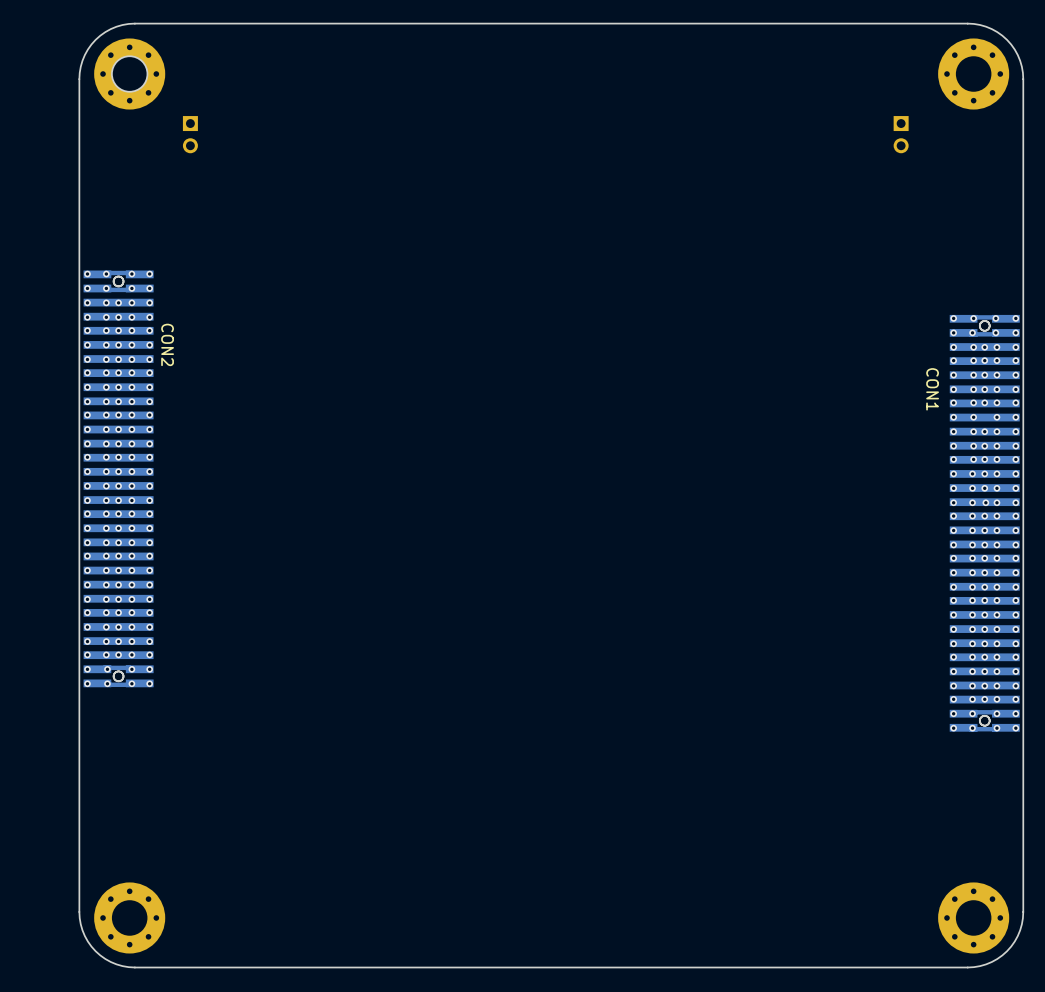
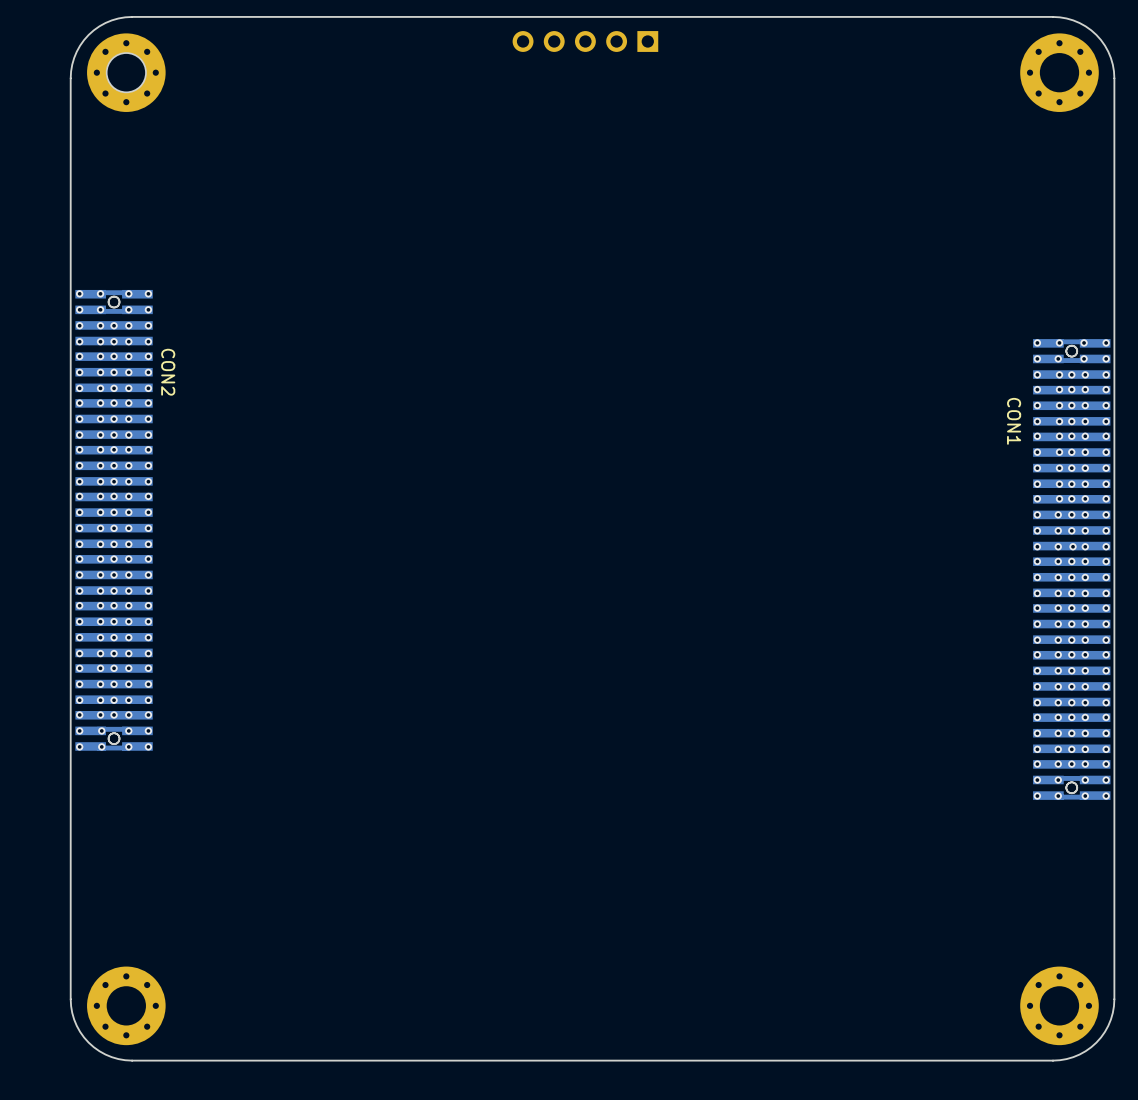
part: none -> (585, 41)
part: (190, 134) -> none
part: (901, 134) -> none
via: none -> (1071, 452)

